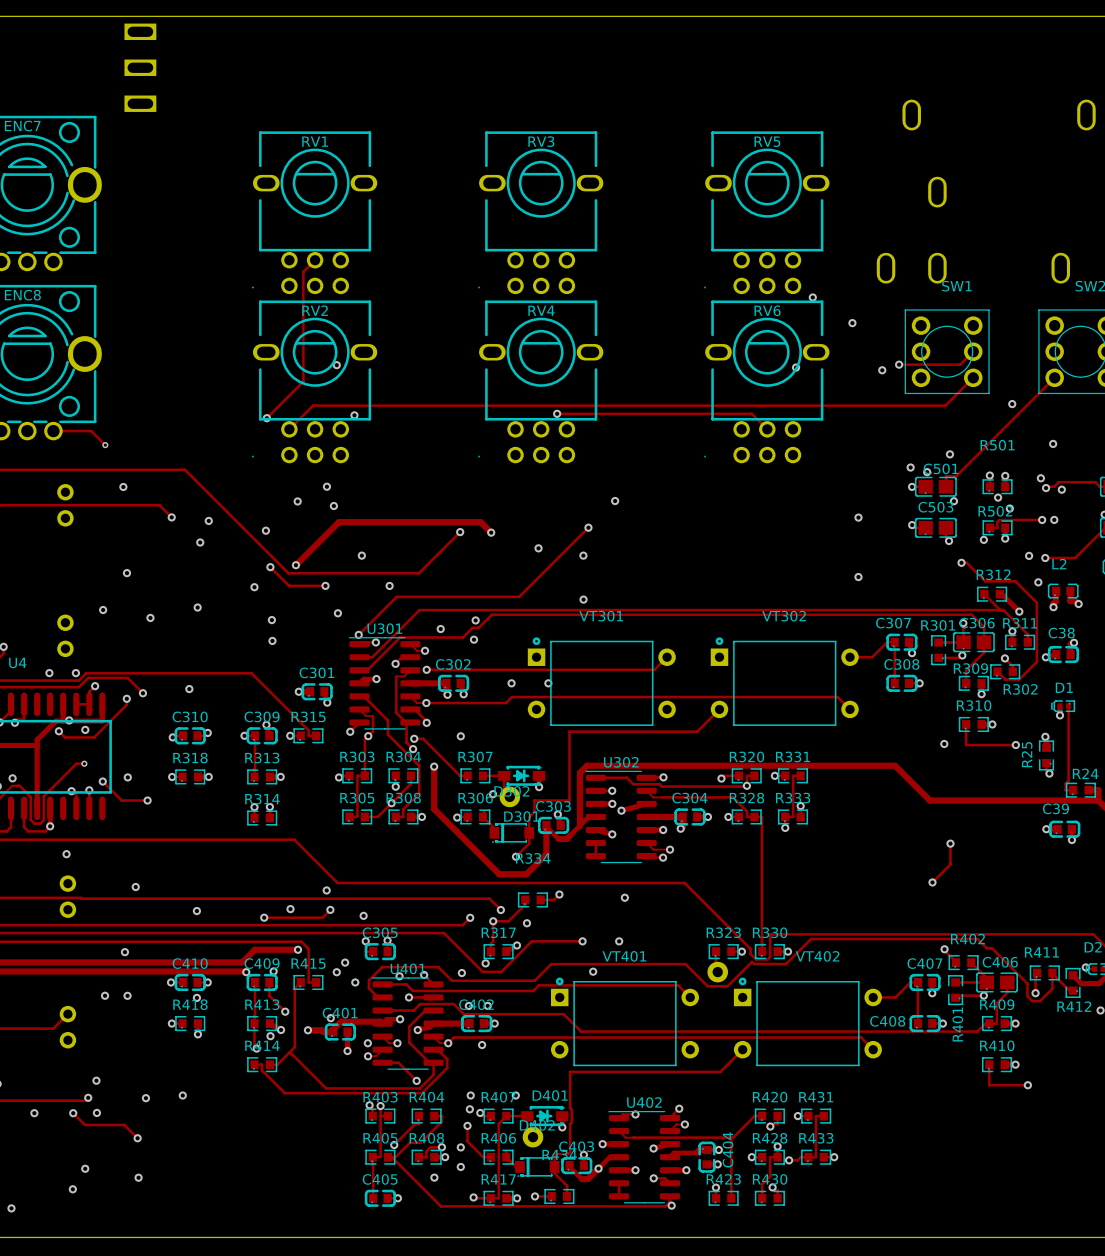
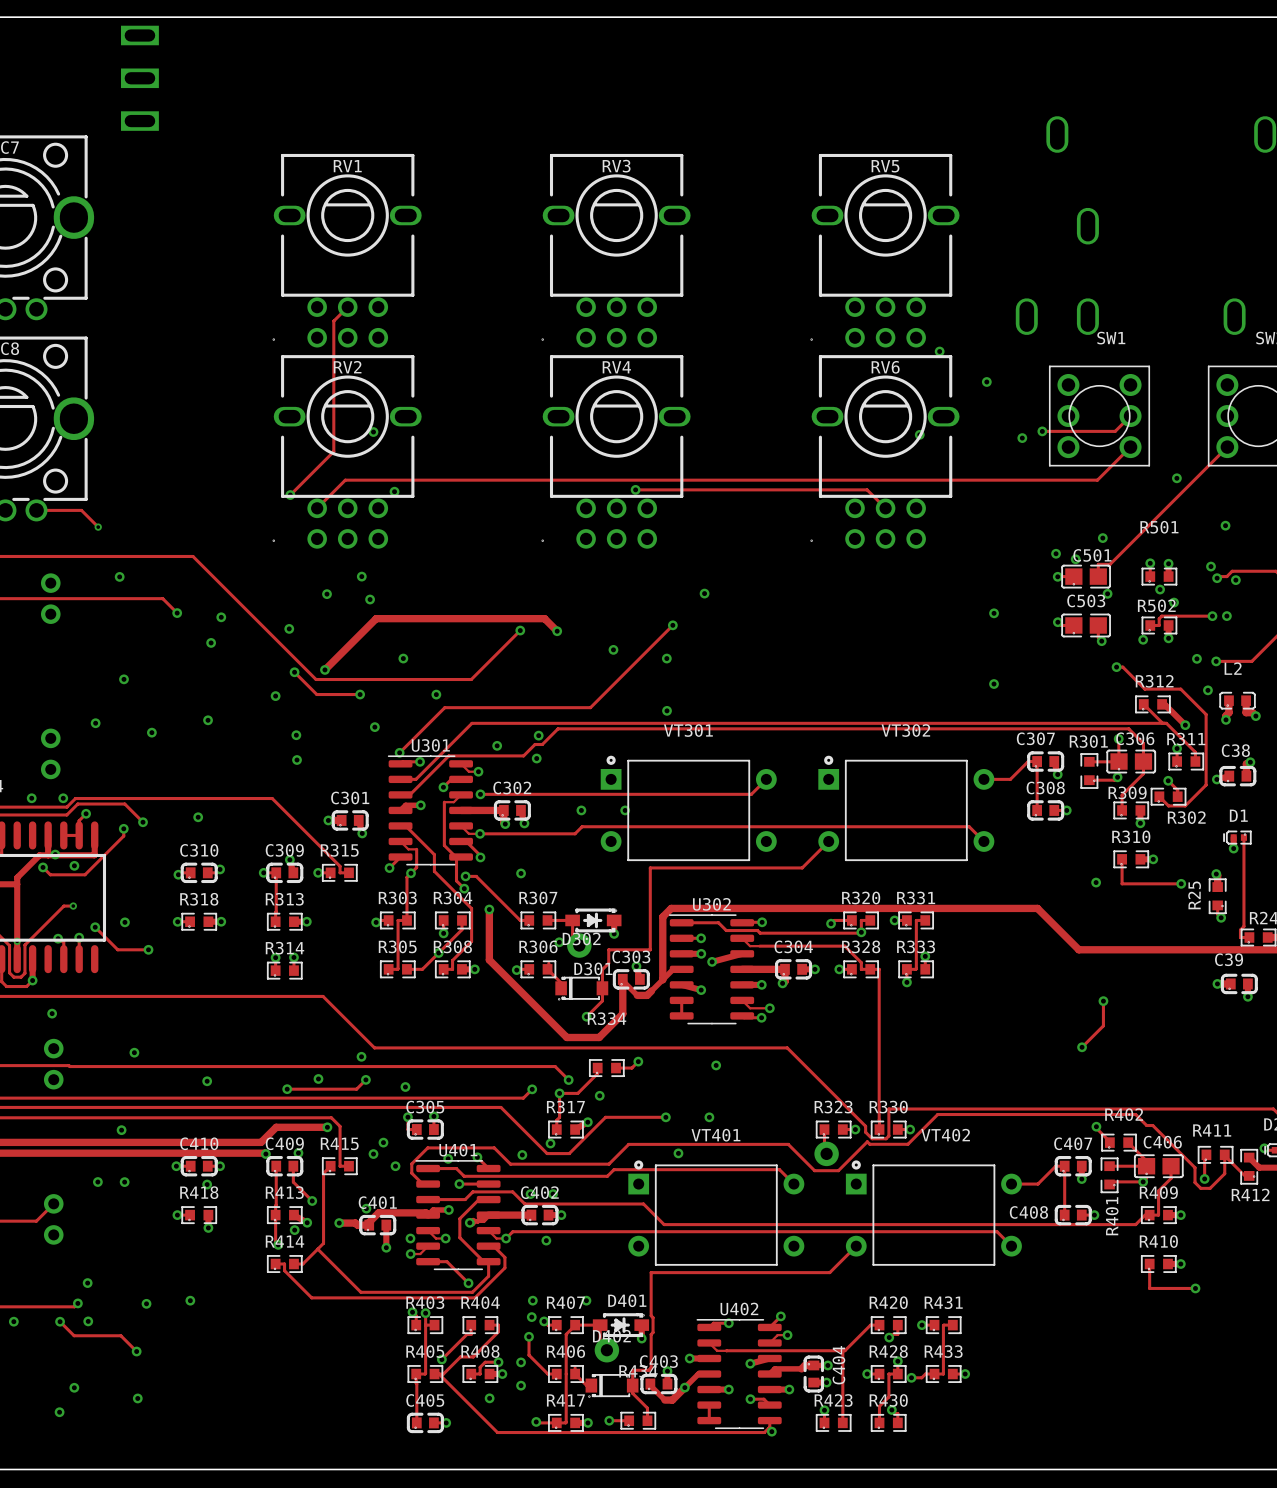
via: none -> (17, 941)

